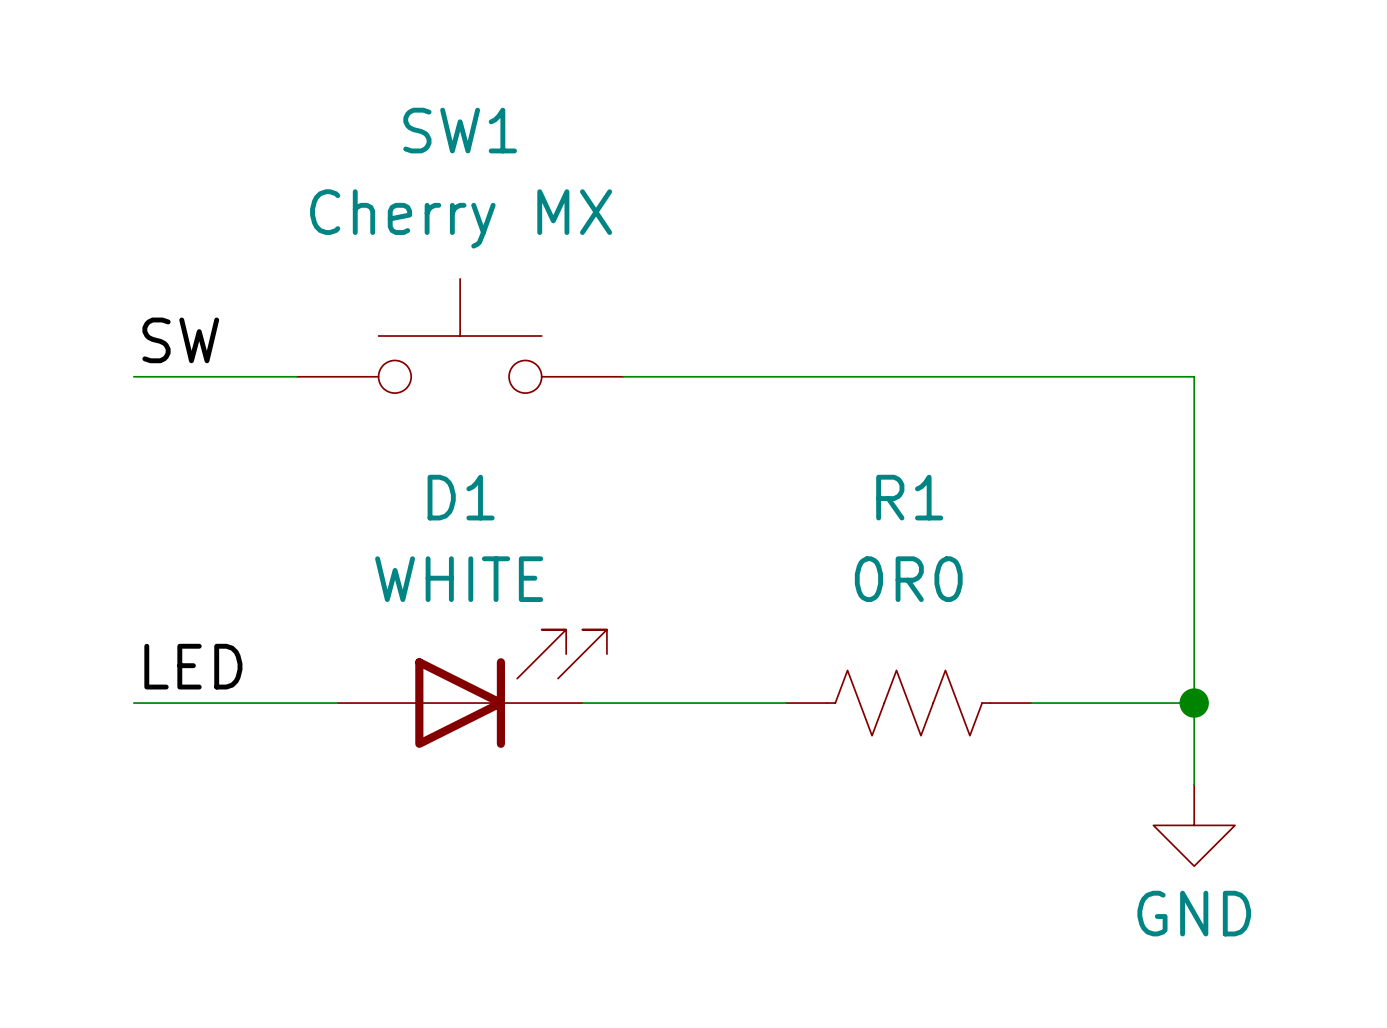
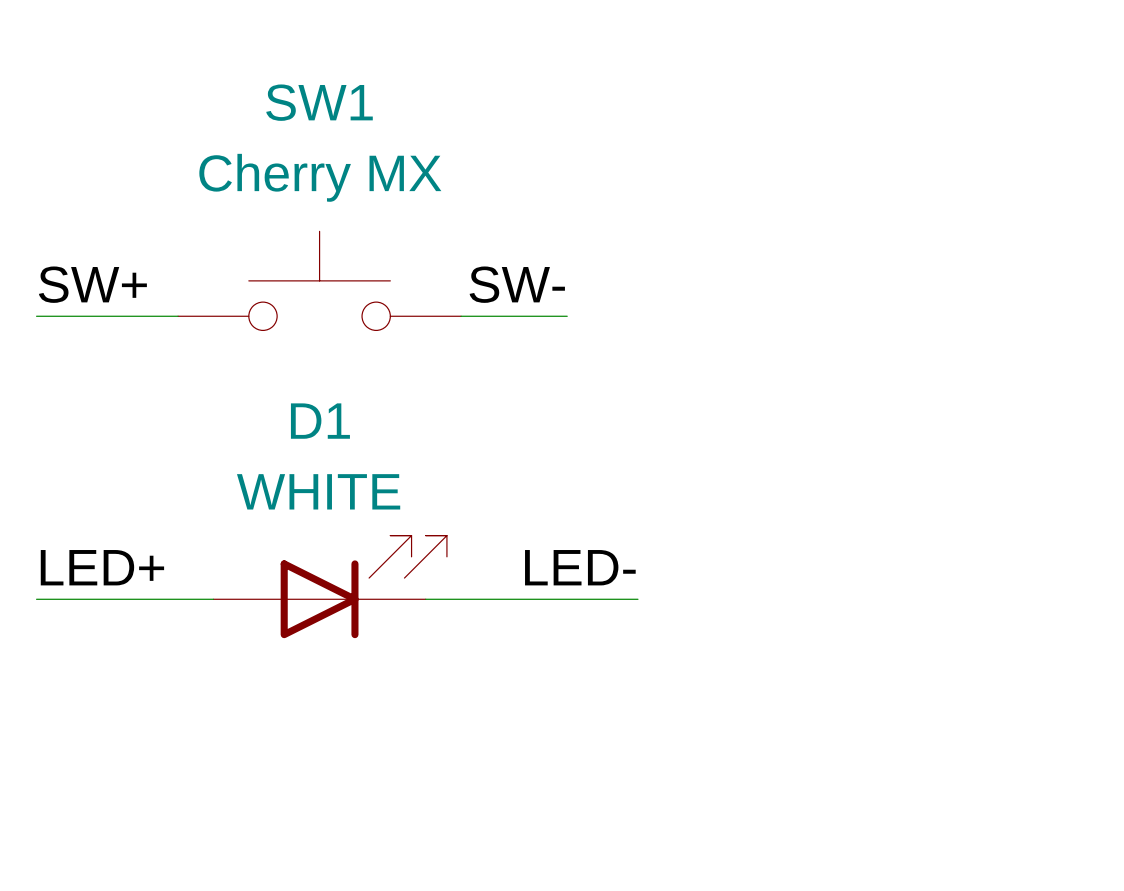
label: SW (180, 340) -> SW+ (92, 284)
label: none -> SW- (517, 284)
wire: (745, 376) (1194, 376) (1194, 784) -> none
label: LED (193, 666) -> LED+ (102, 567)
label: none -> LED- (580, 567)
R1: 0R0 (908, 703) -> none
wire: (1031, 703) (1194, 703) -> none
junction: (1194, 703) -> none
power symbol: GND (1194, 825) -> none

